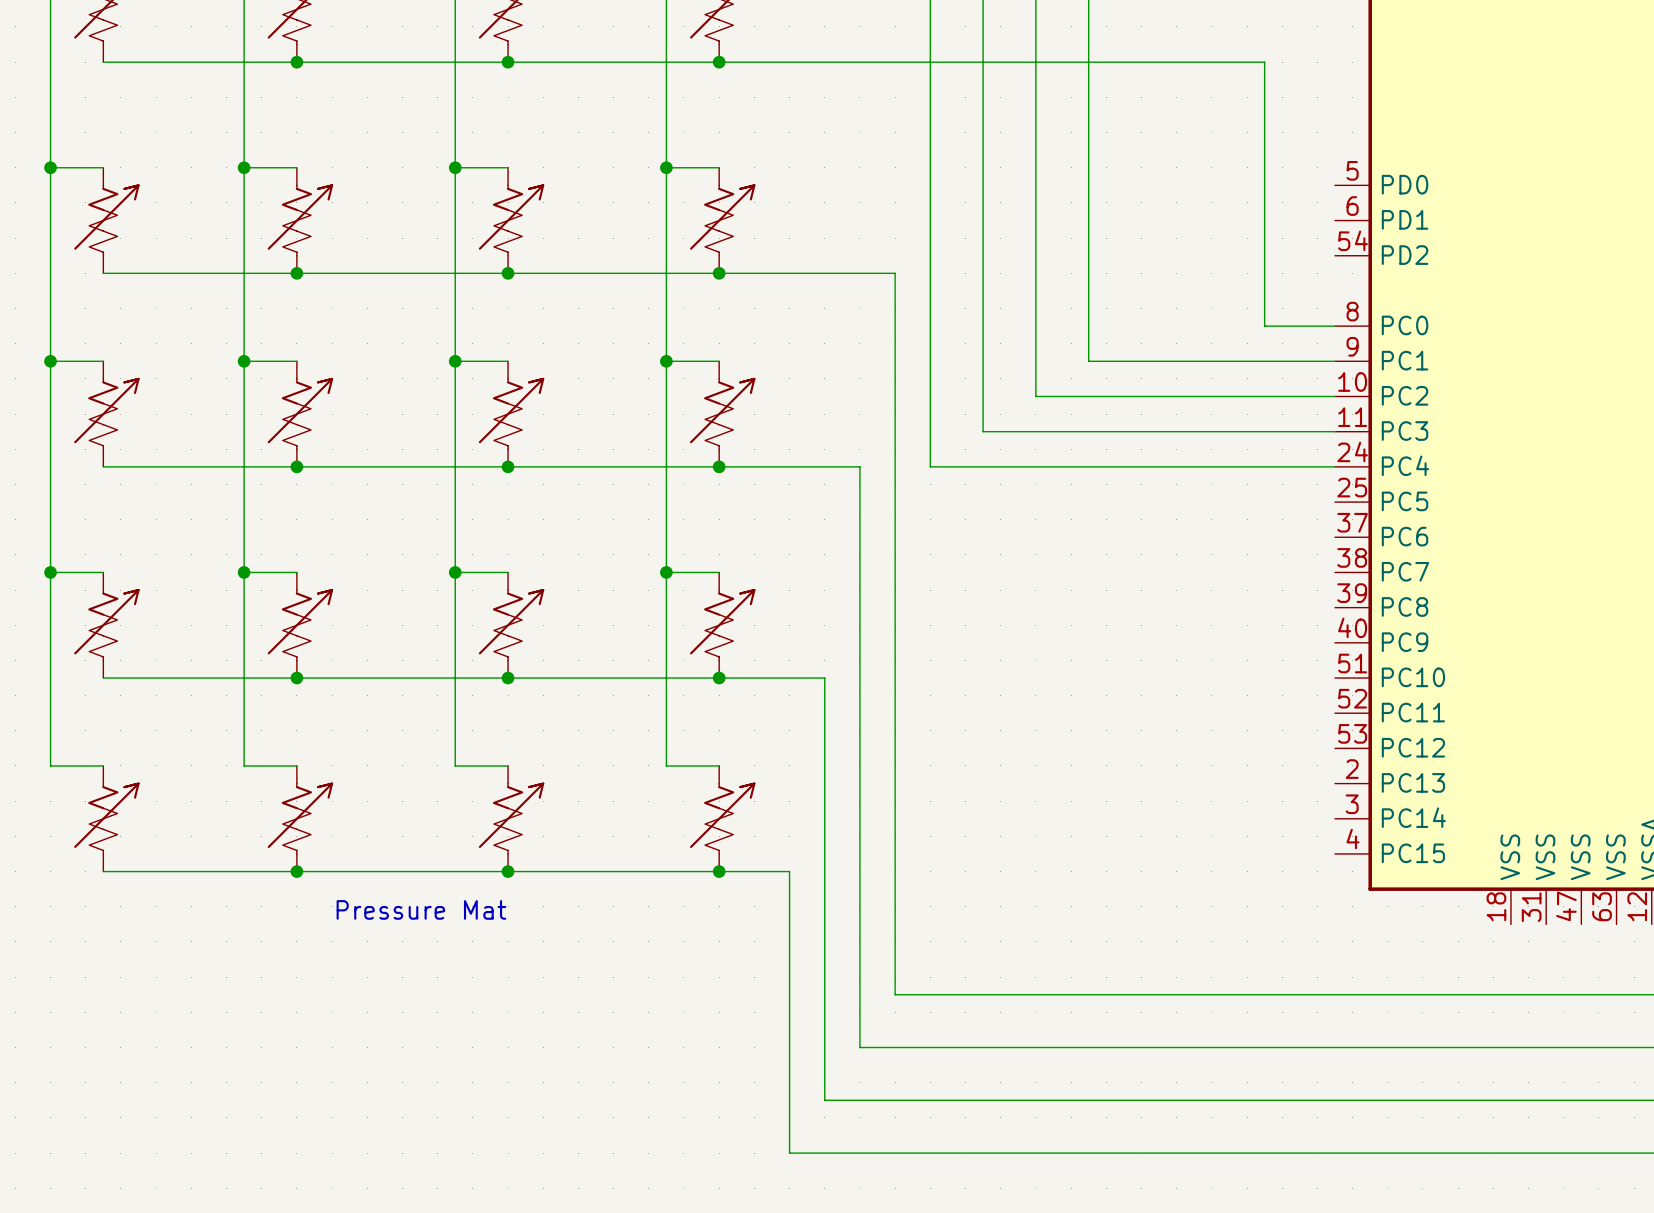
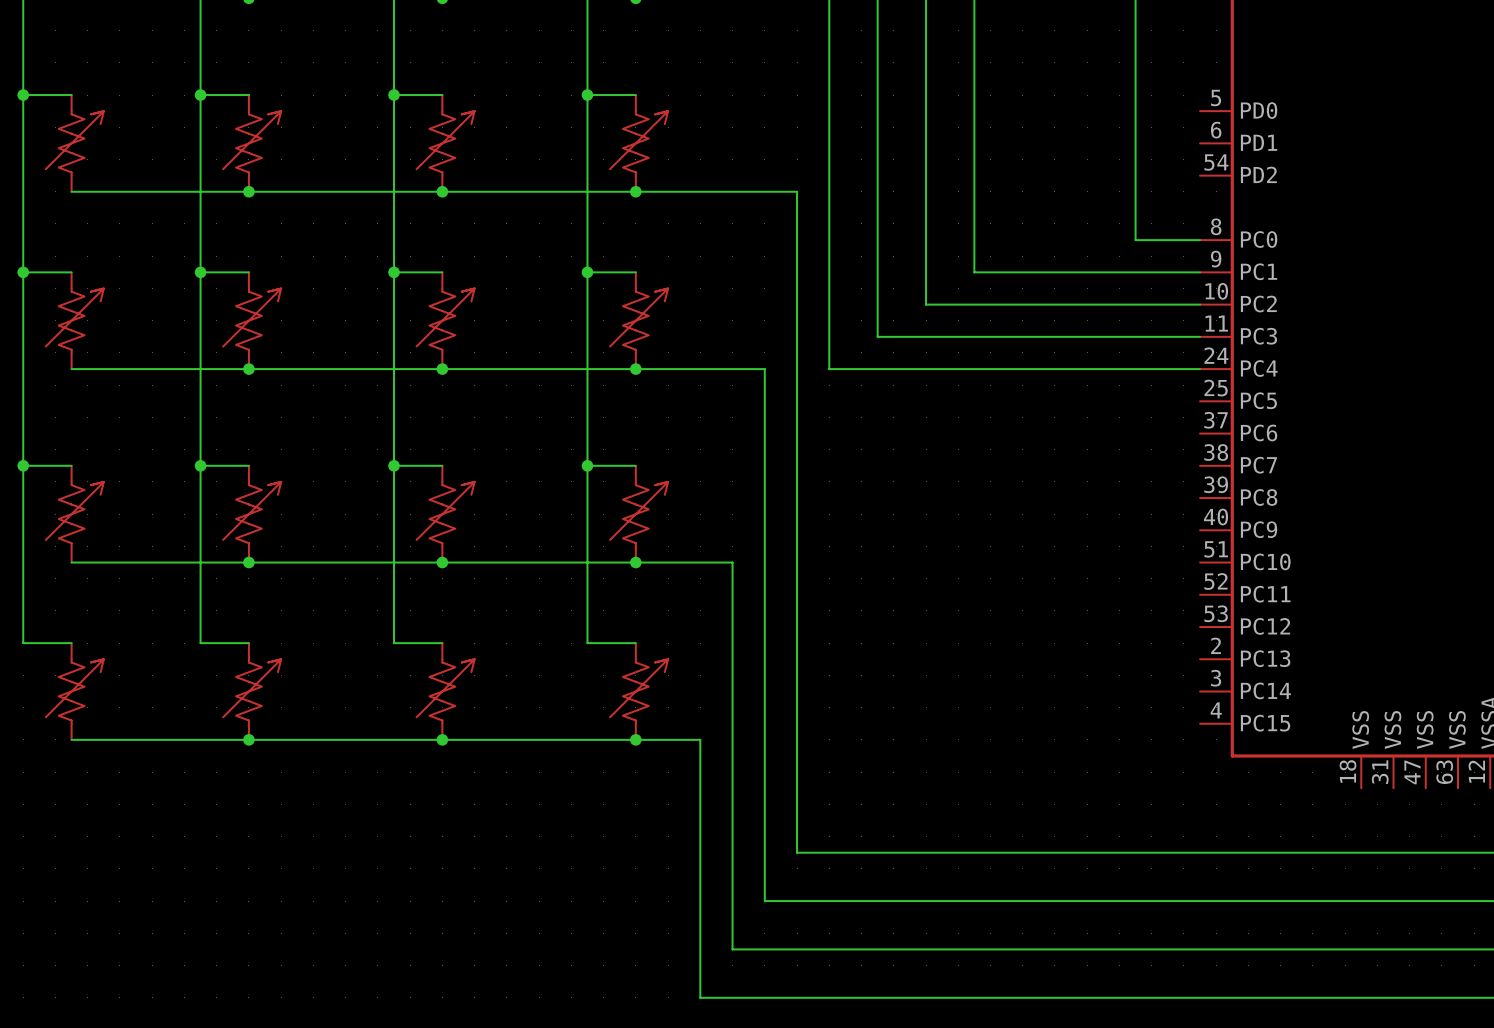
text: Pressure Mat (421, 909) -> none

